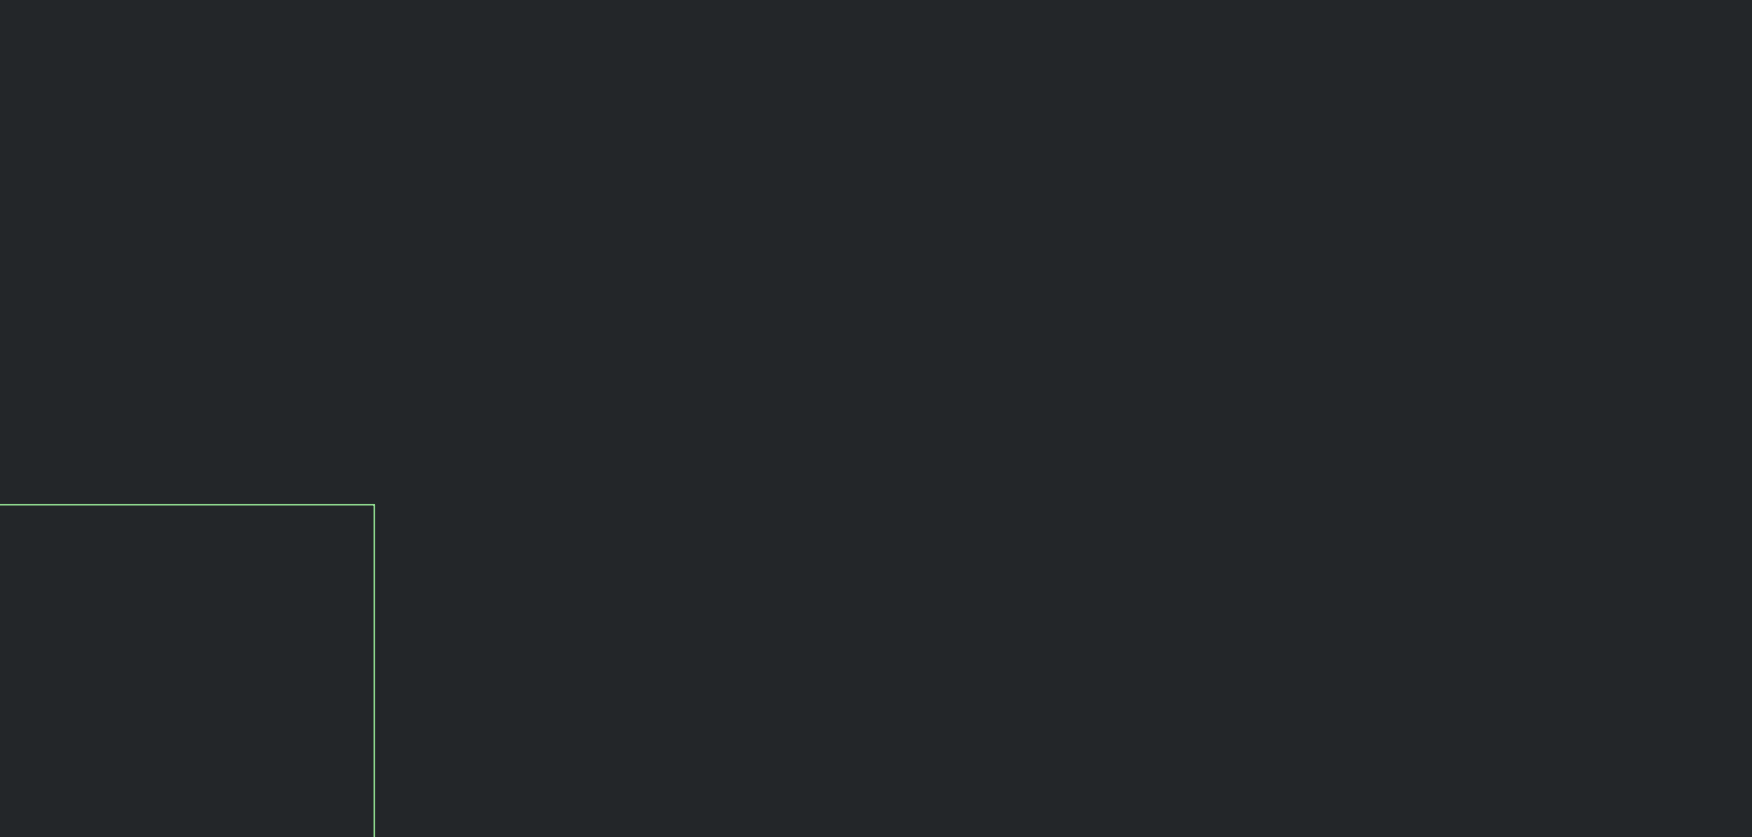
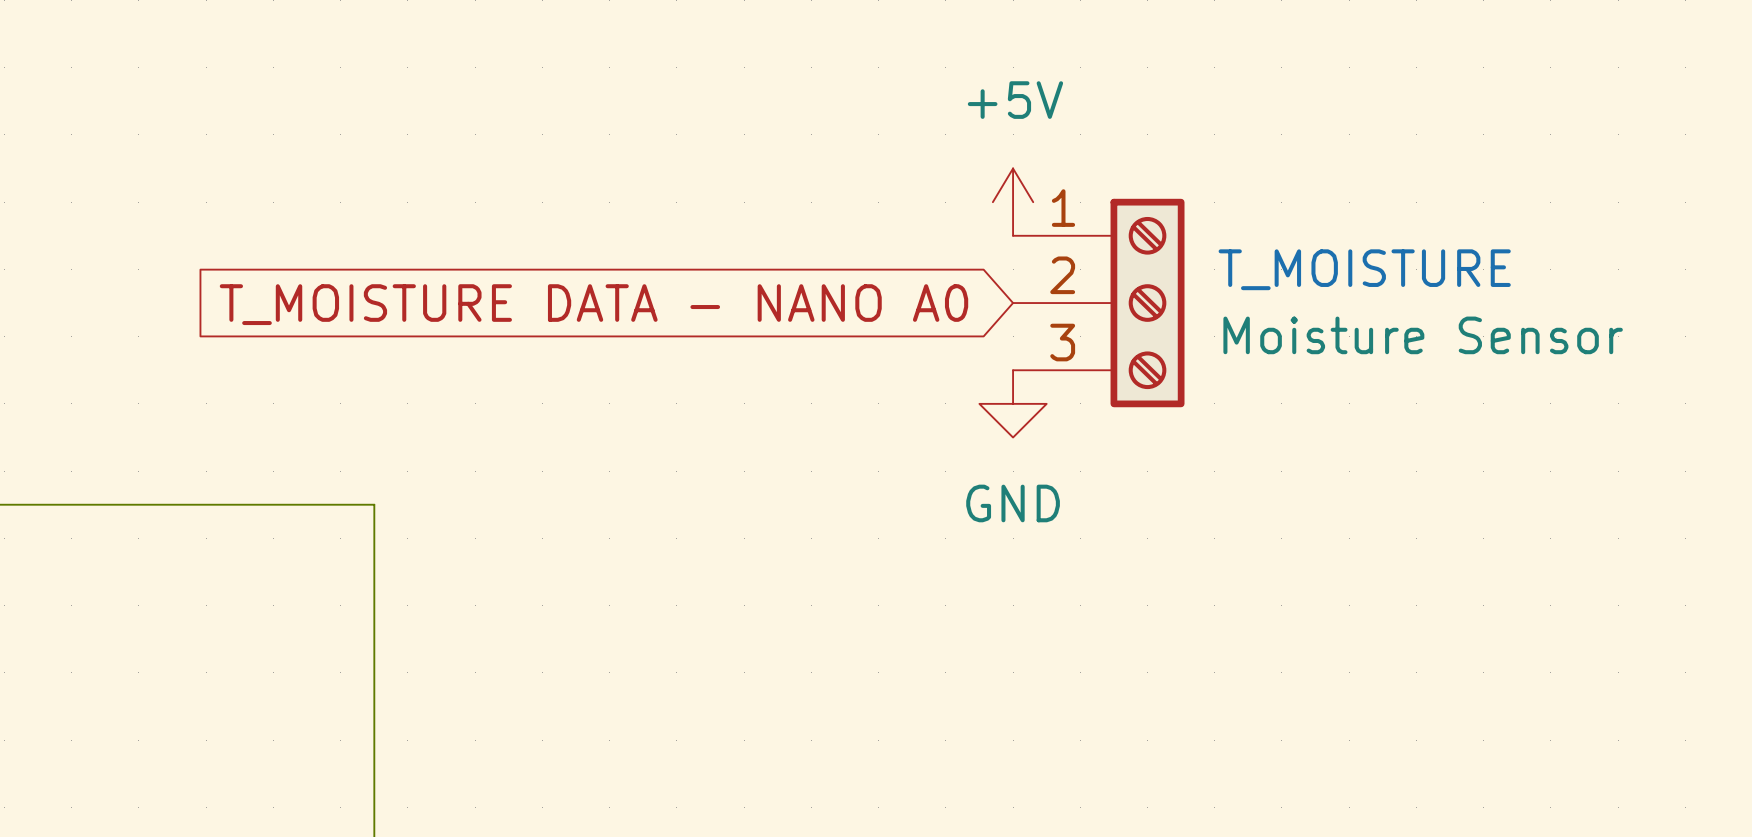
power symbol: none -> +5V (1013, 202)
T_MOISTURE: none -> Moisture Sensor (1098, 303)
global label: none -> T_MOISTURE DATA - NANO A0 (593, 304)
power symbol: none -> GND (1013, 403)

